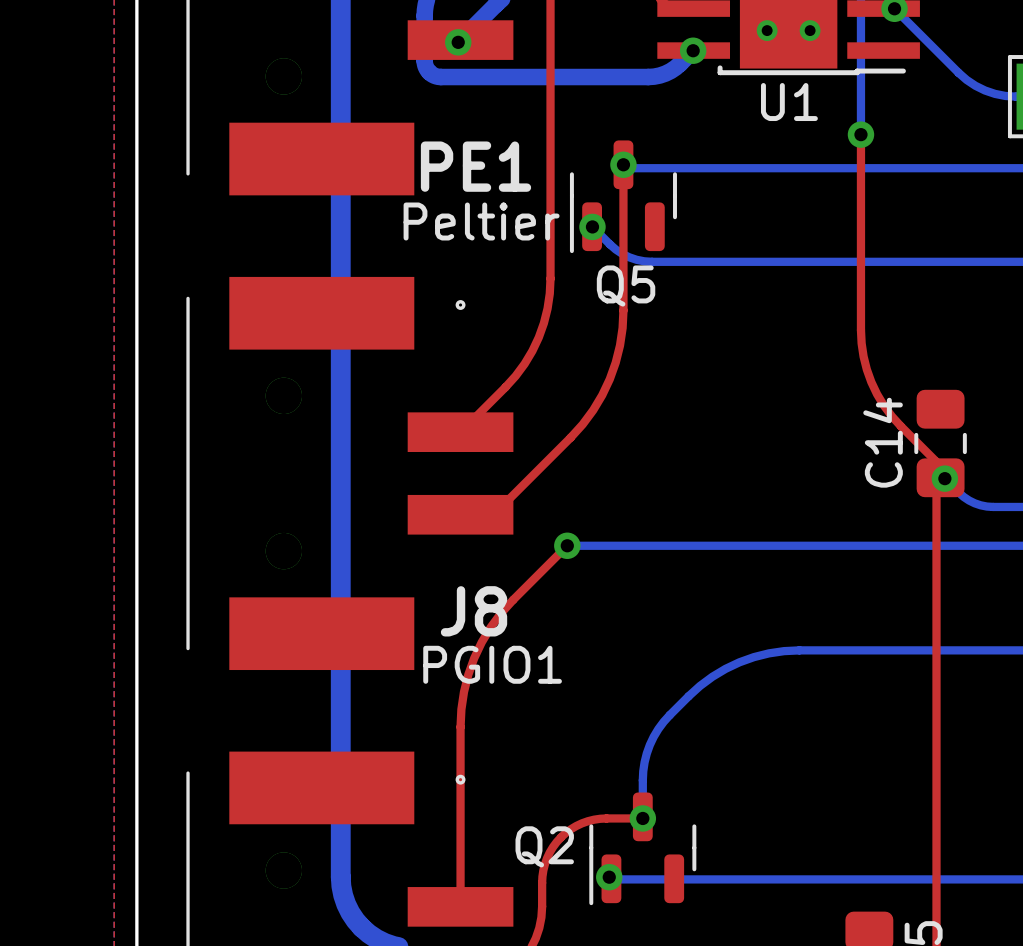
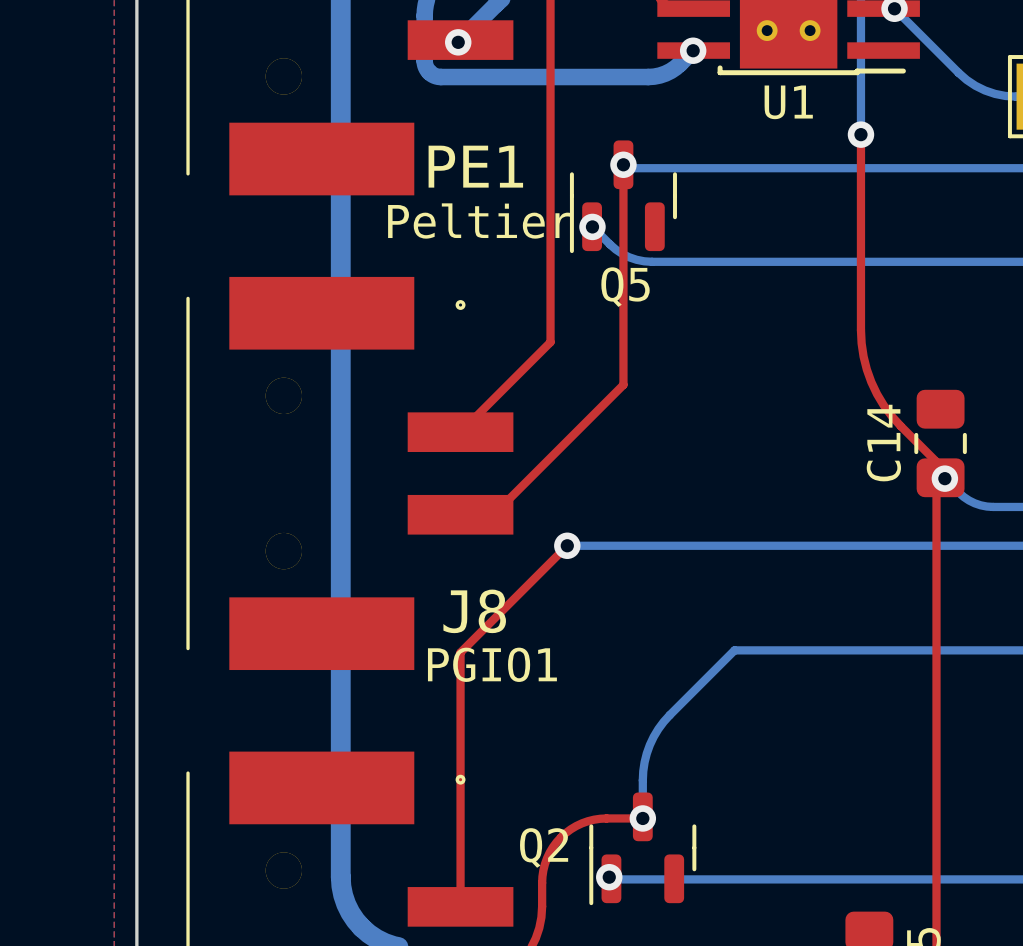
top track: (550, 278) (547, 308) (538, 337) (524, 363) (505, 387) -> (550, 278) (550, 342) (505, 387)
top track: (623, 310) (620, 345) (609, 379) (593, 410) (570, 437) -> (623, 310) (623, 384) (570, 437)
top track: (513, 599) (490, 627) (474, 658) (463, 691) (460, 726) -> (513, 599) (460, 652) (460, 726)
bottom track: (799, 650) (768, 653) (739, 662) (712, 676) (688, 696) -> (799, 650) (734, 650) (688, 696)

